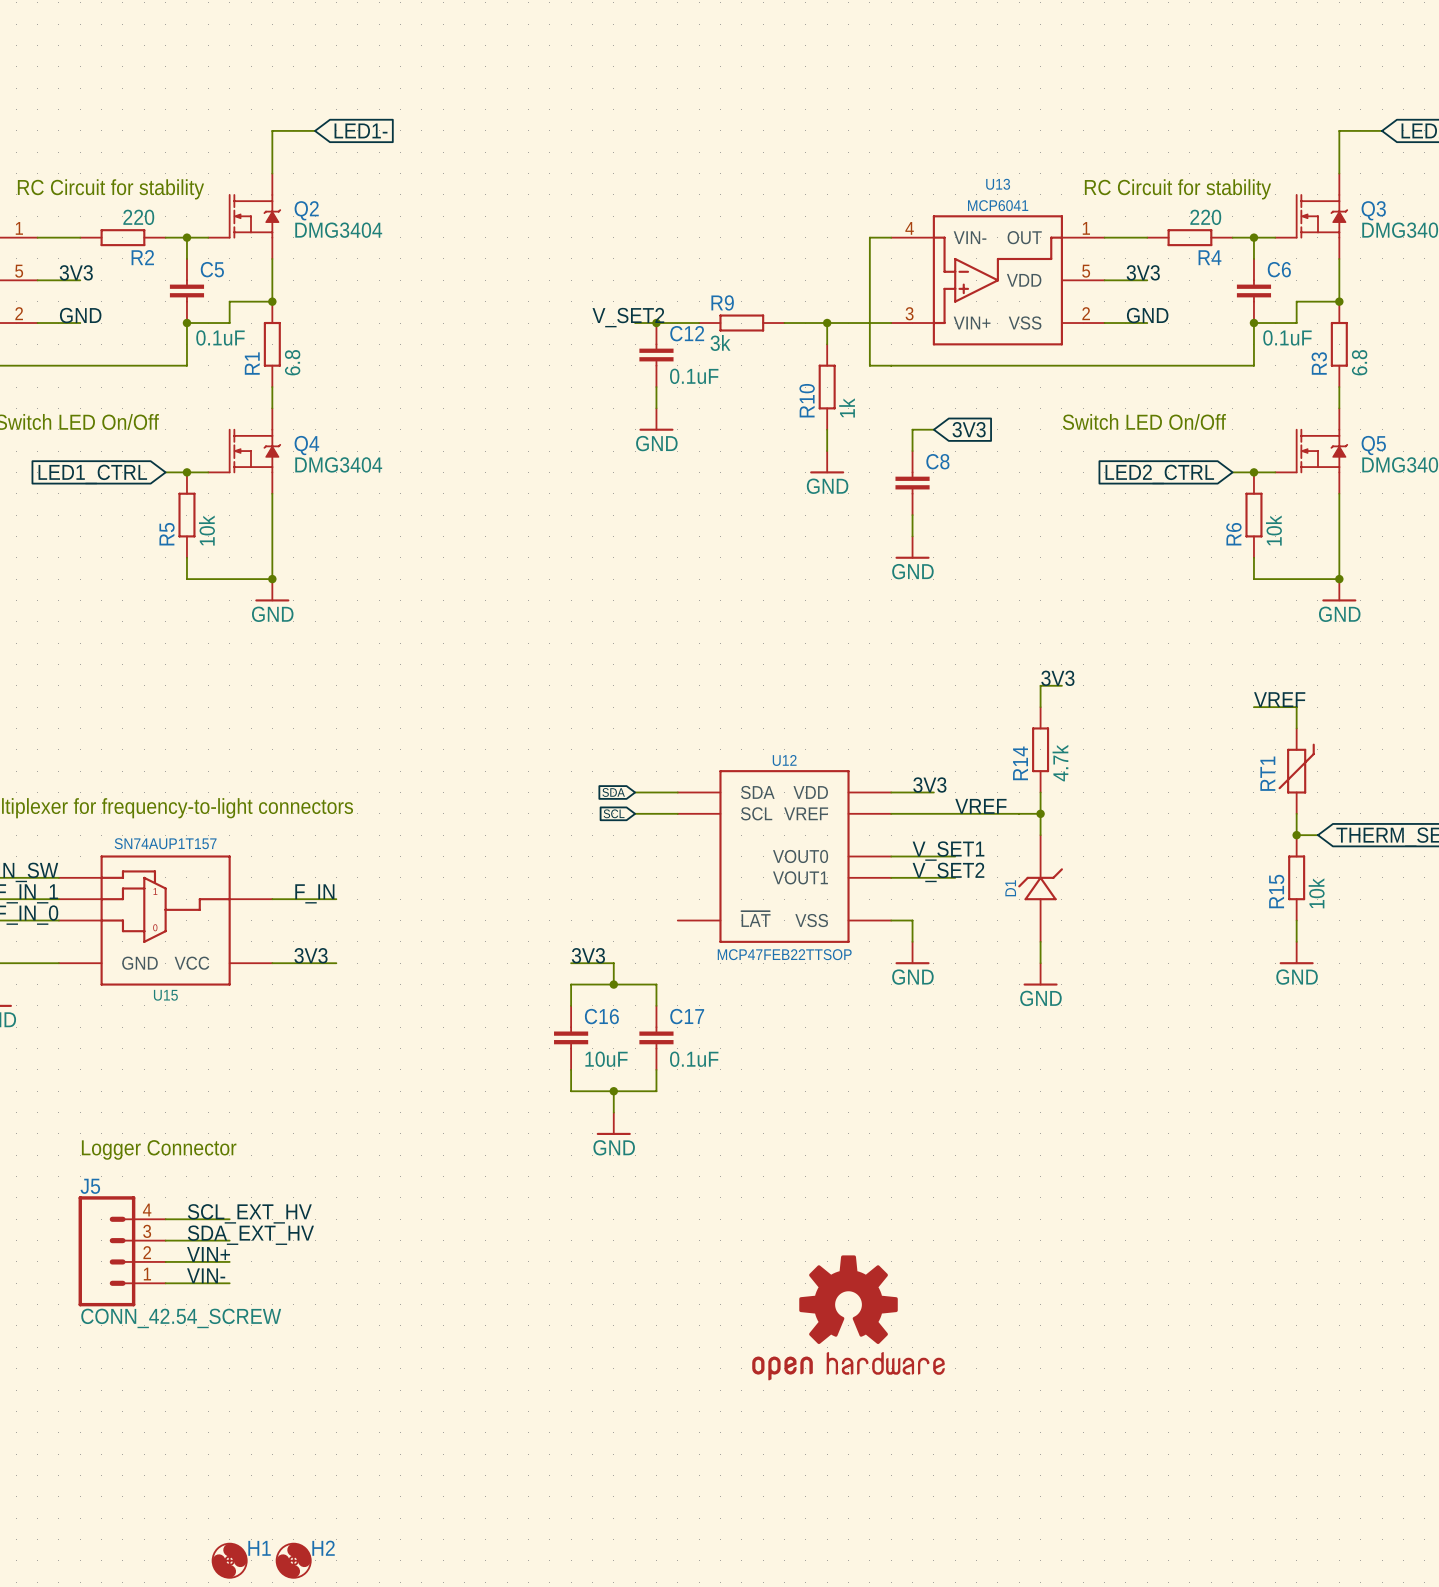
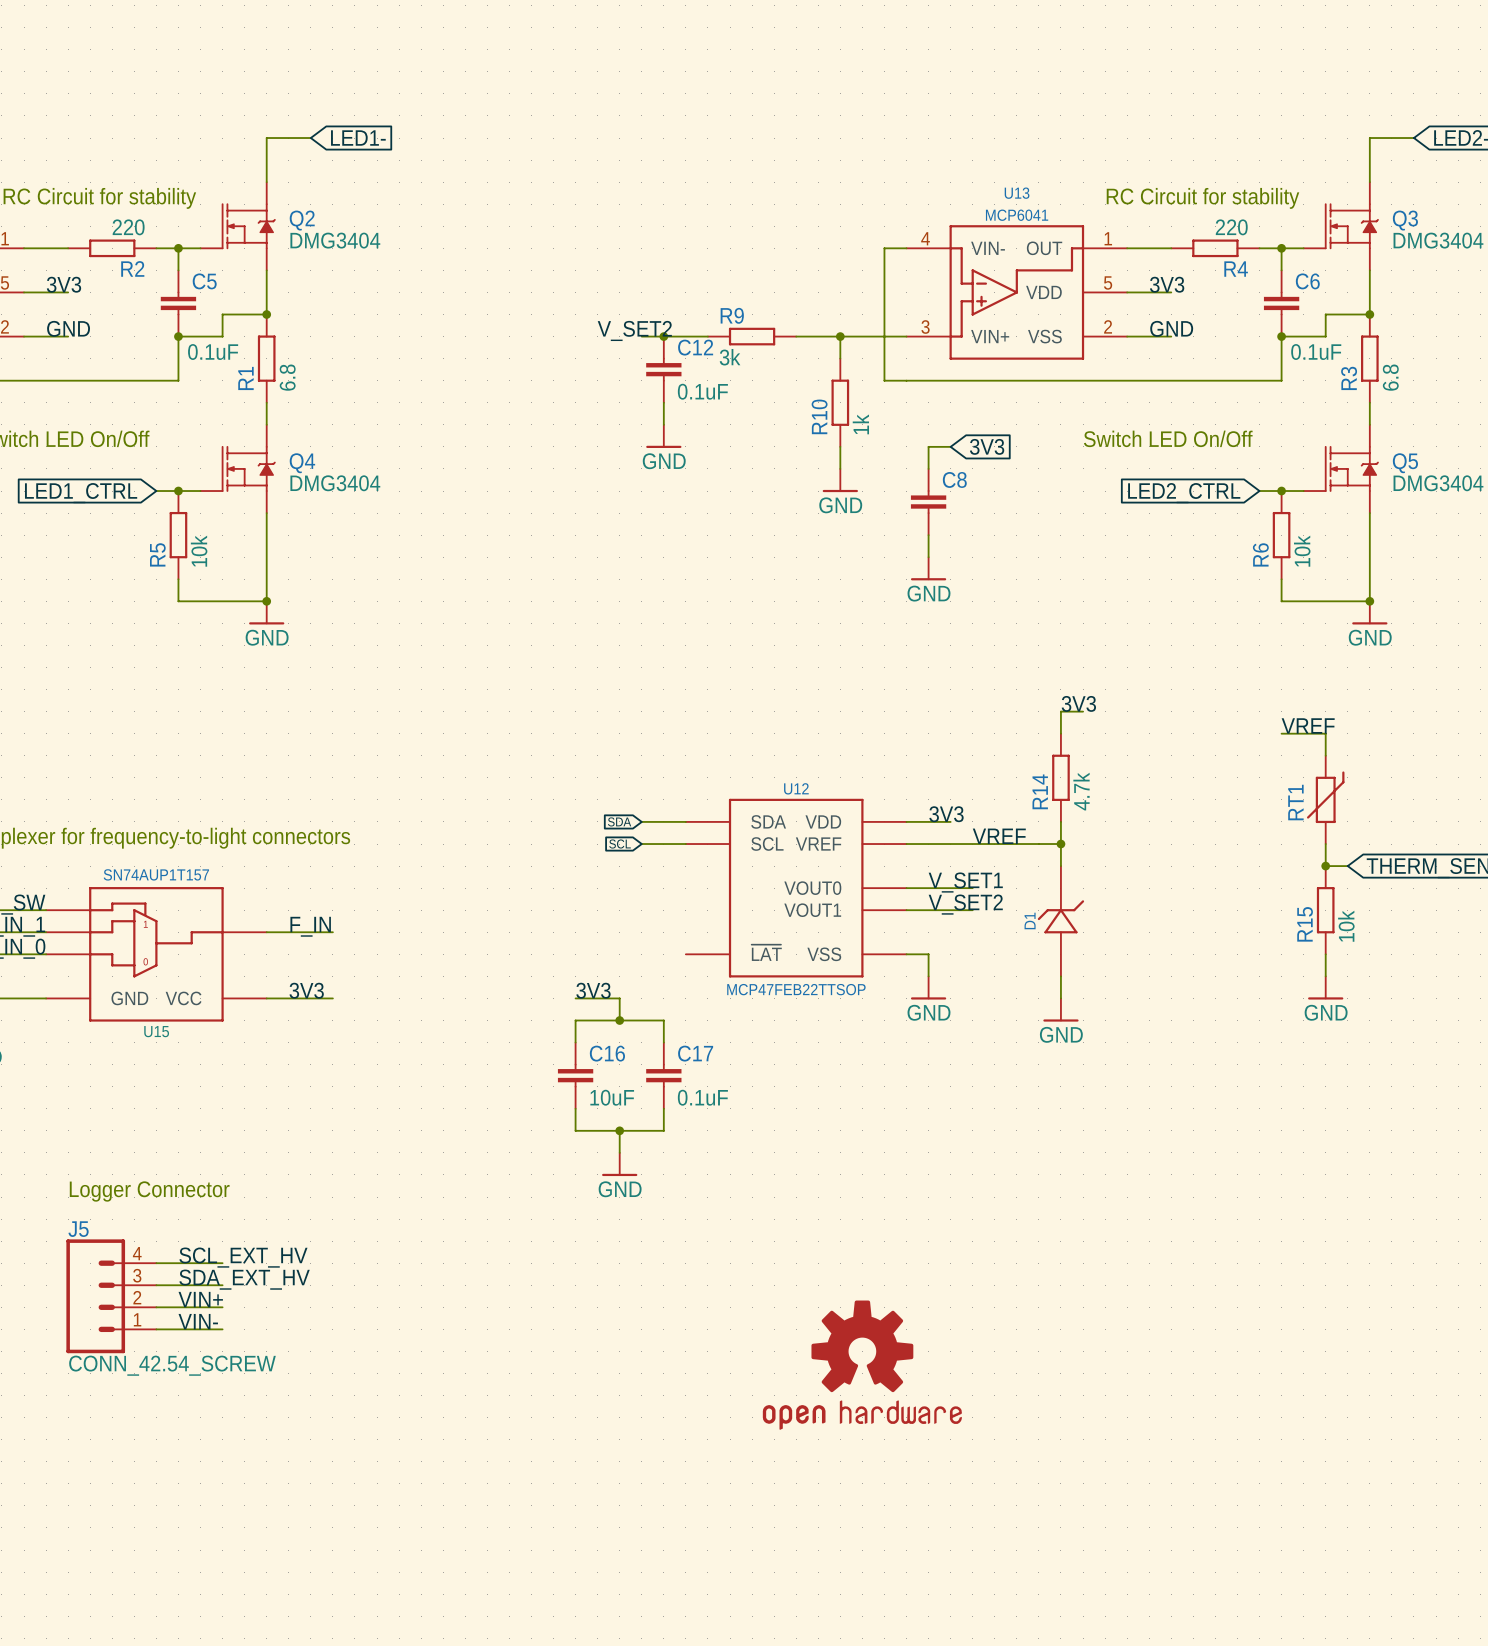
H1: (229, 1560) -> none
H2: (293, 1560) -> none

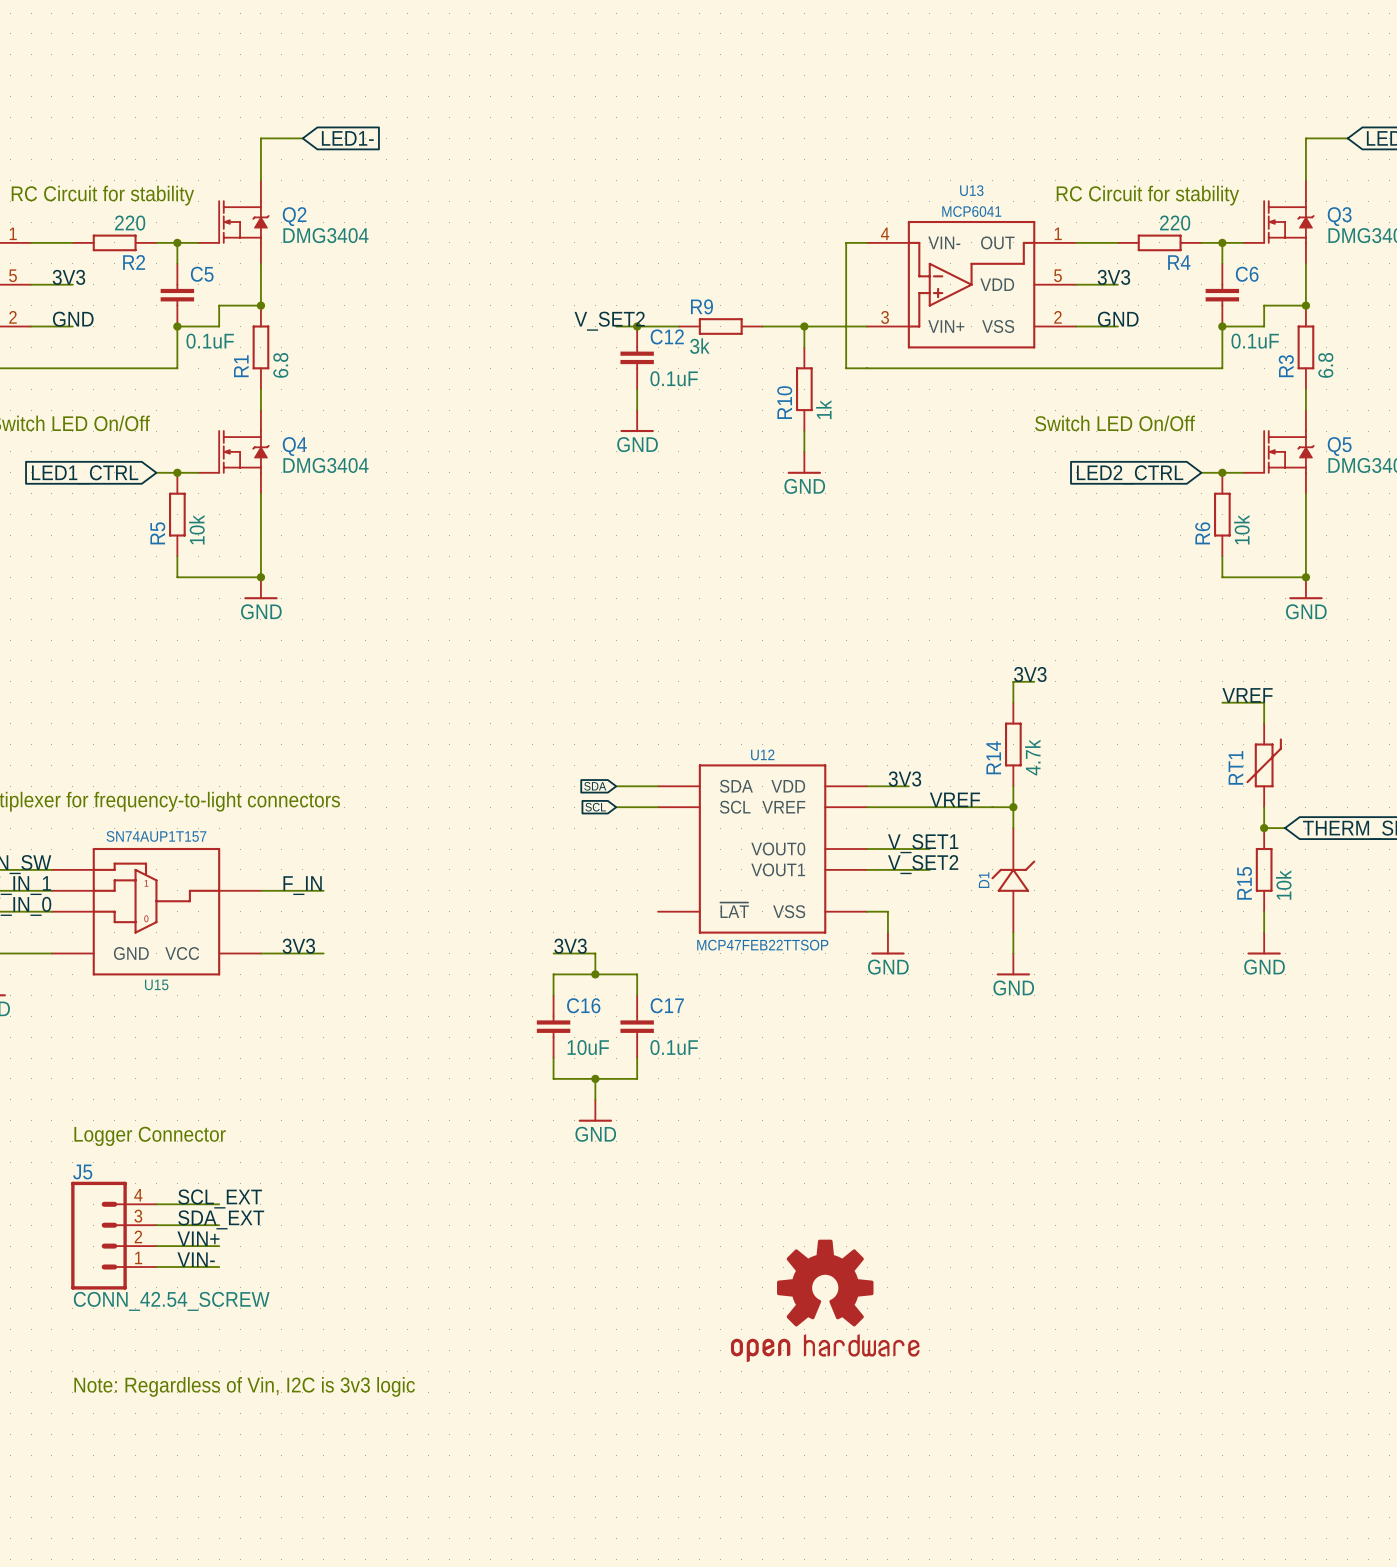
wire: (950, 446) (928, 446) (928, 468) -> none
global label: 3V3 (987, 446) -> none
C8: (928, 502) -> none
wire: (928, 535) (928, 557) -> none
power symbol: GND (928, 568) -> none
label: SCL_EXT_HV (243, 1257) -> SCL_EXT (220, 1198)
label: SDA_EXT_HV (244, 1279) -> SDA_EXT (221, 1219)
text: none -> Note: Regardless of Vin, I2C is 3v3 logic (244, 1386)

